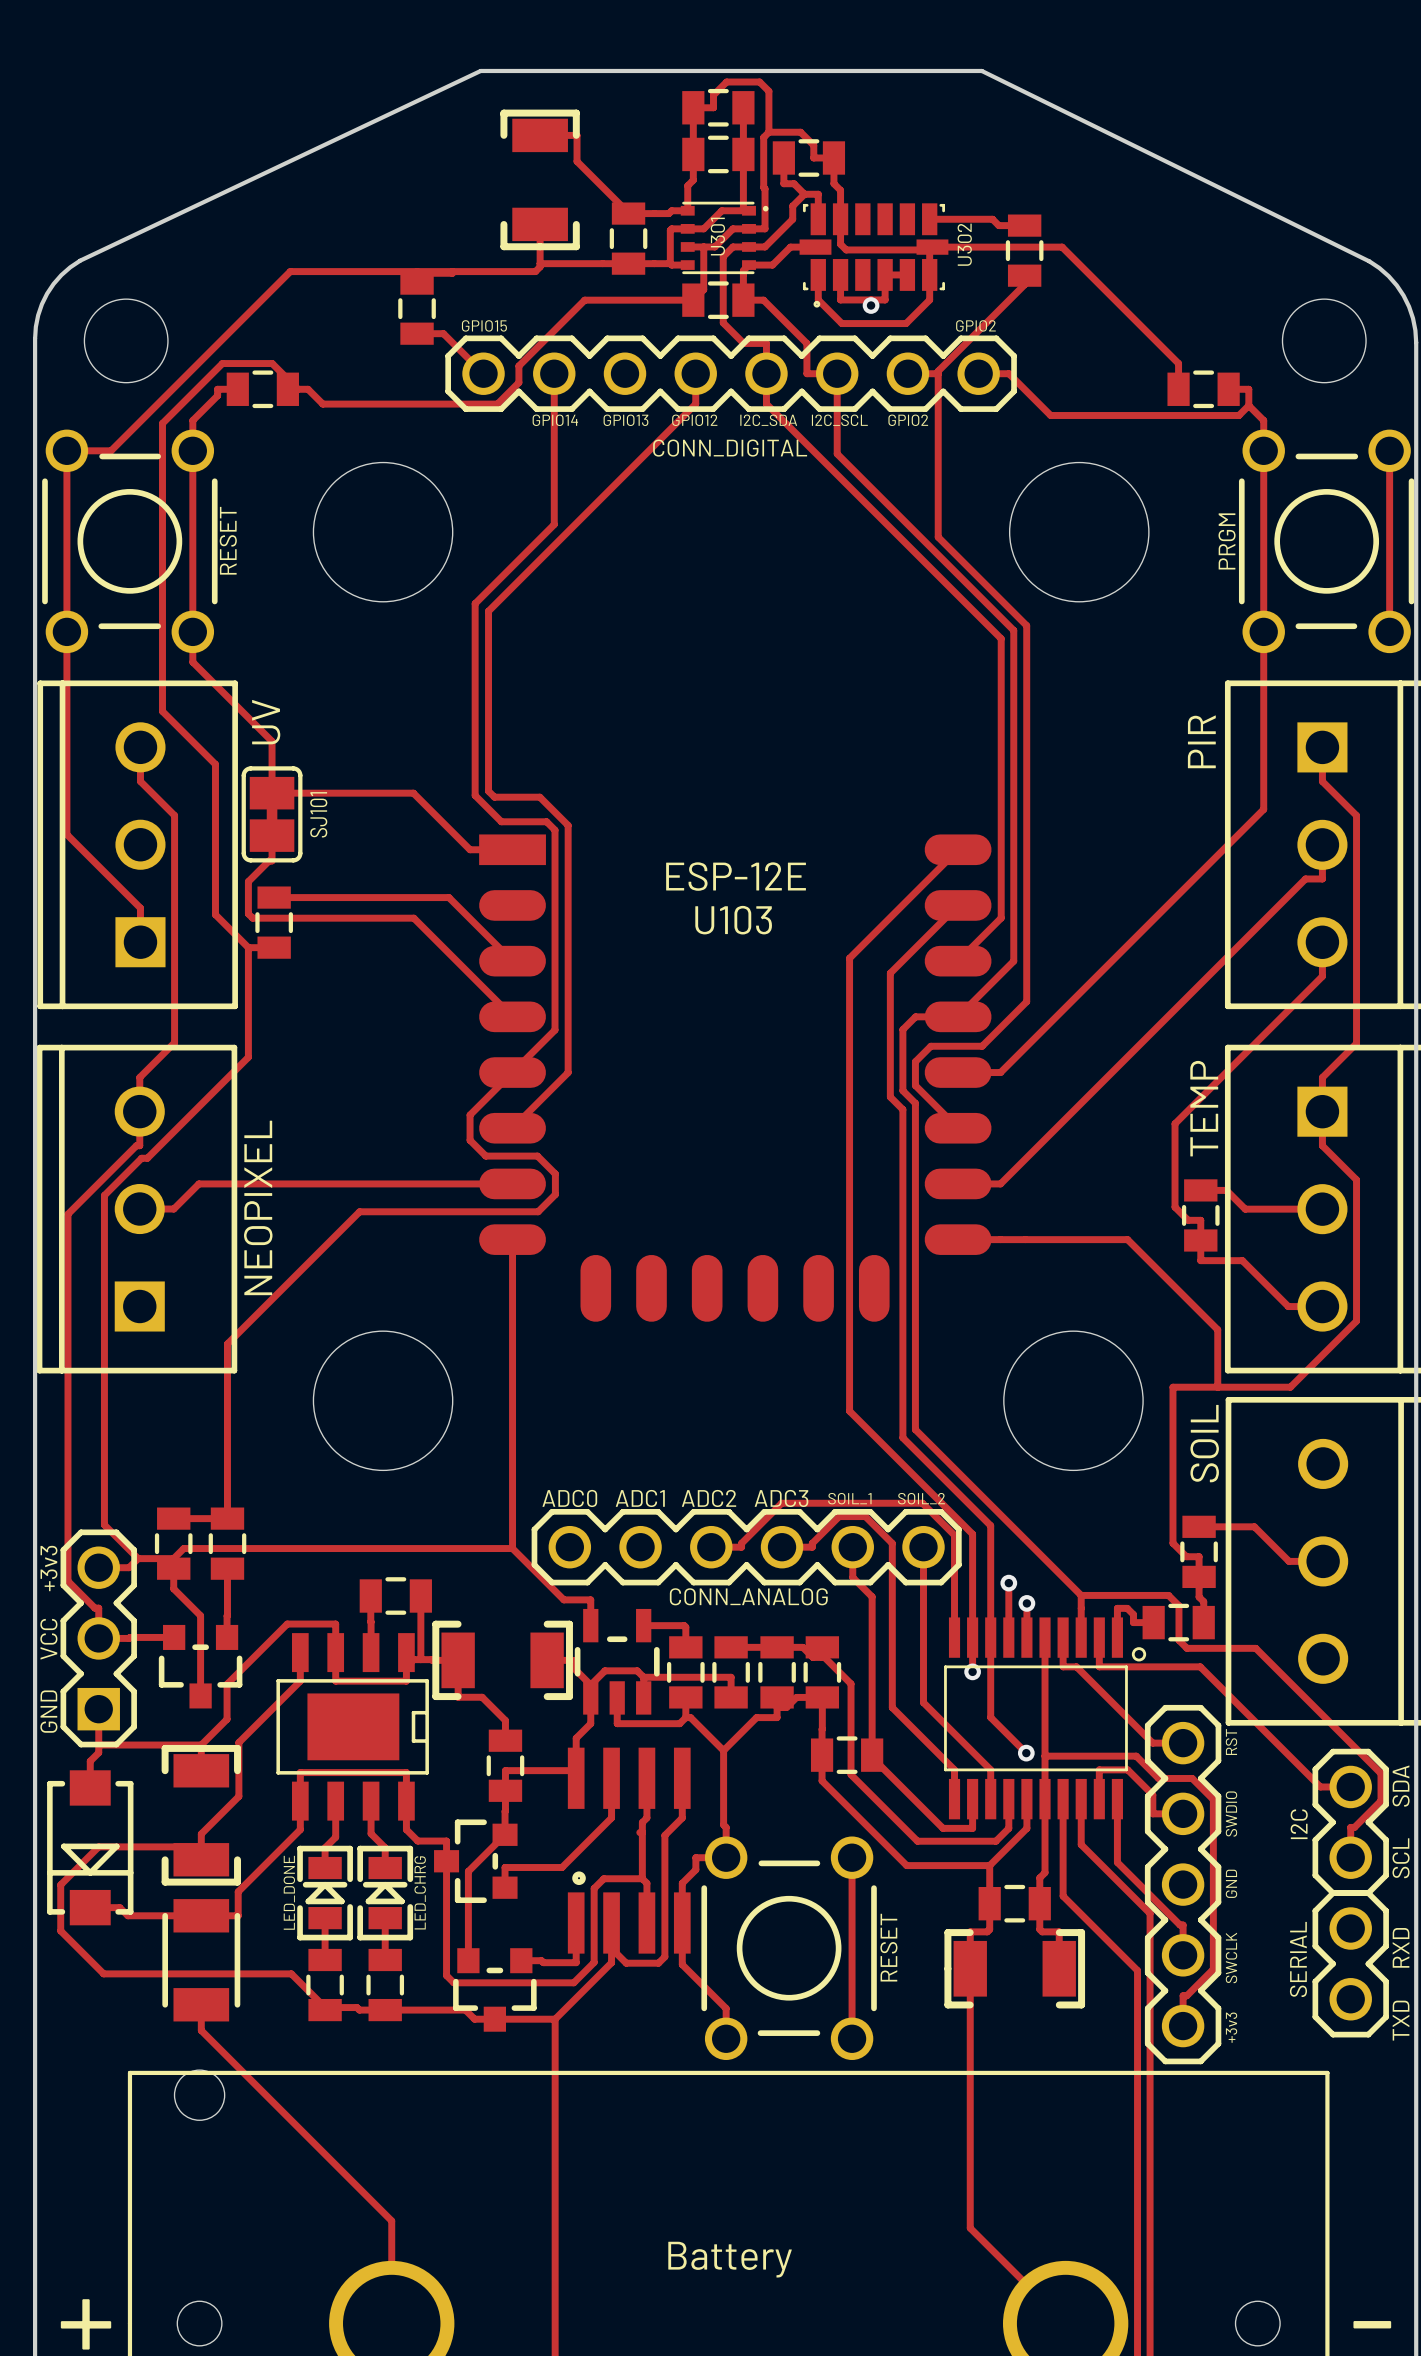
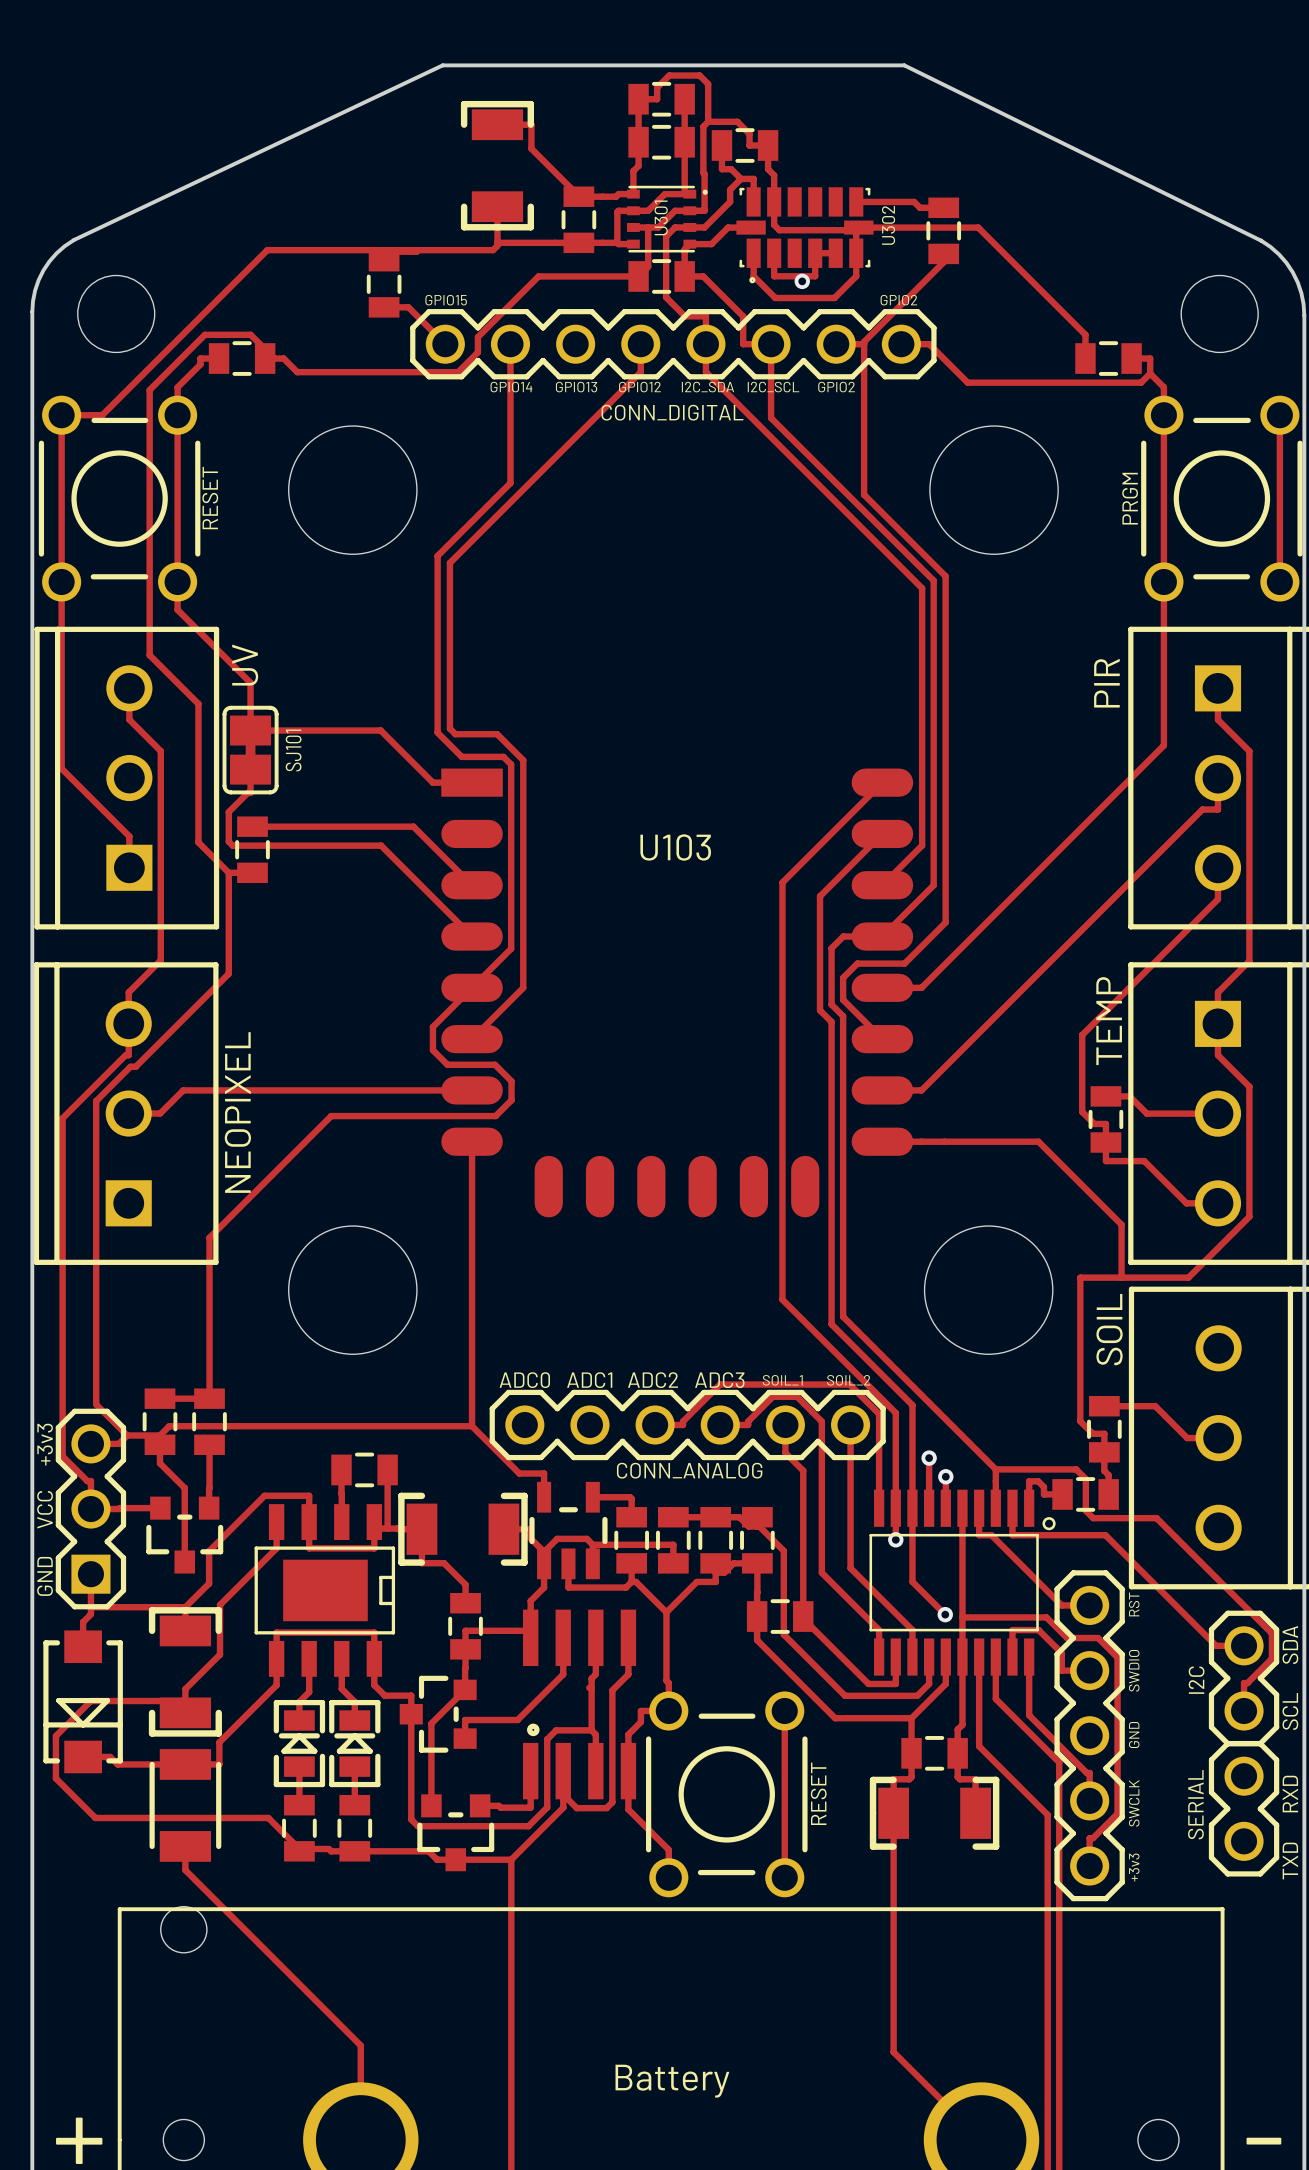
U103 value: ESP-12E (736, 876) -> none
part value: LED_DONE (289, 1892) -> none
part value: LED_CHRG (420, 1892) -> none

